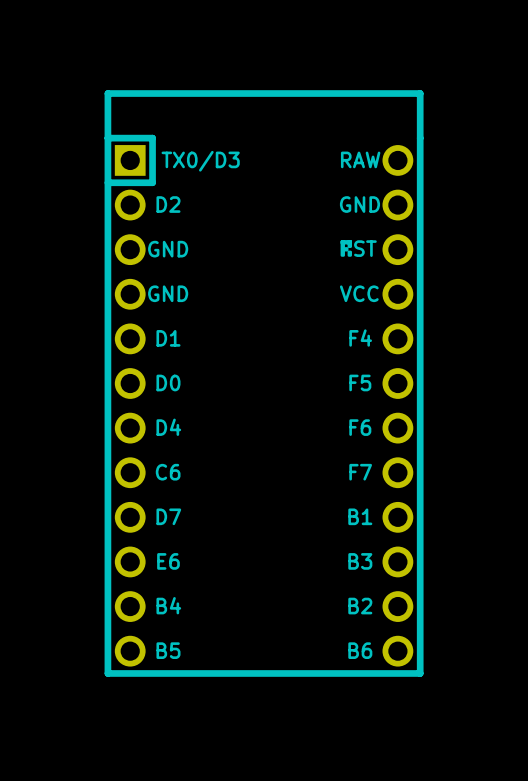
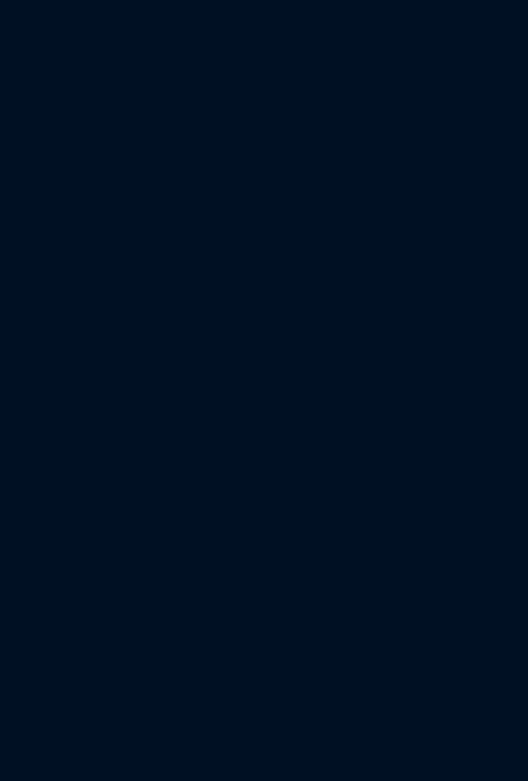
part: (264, 383) -> none

